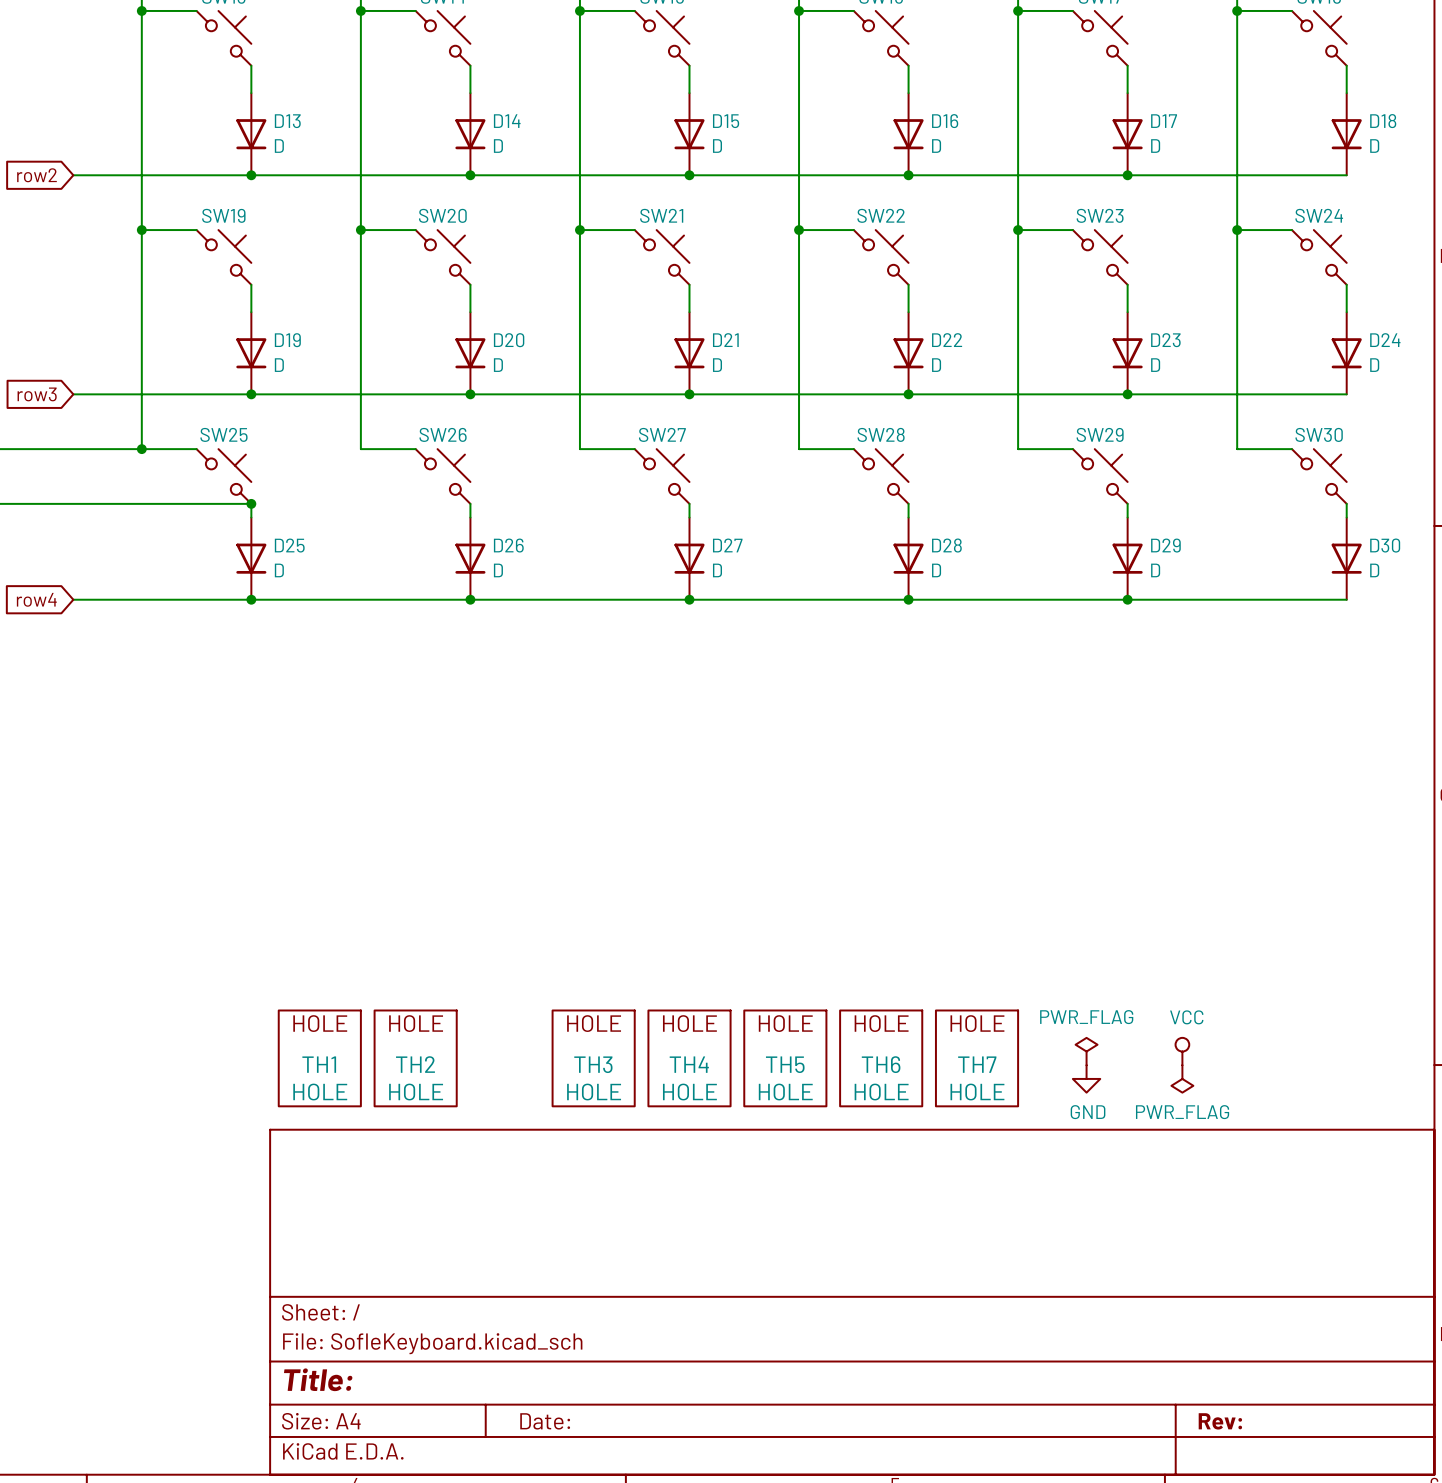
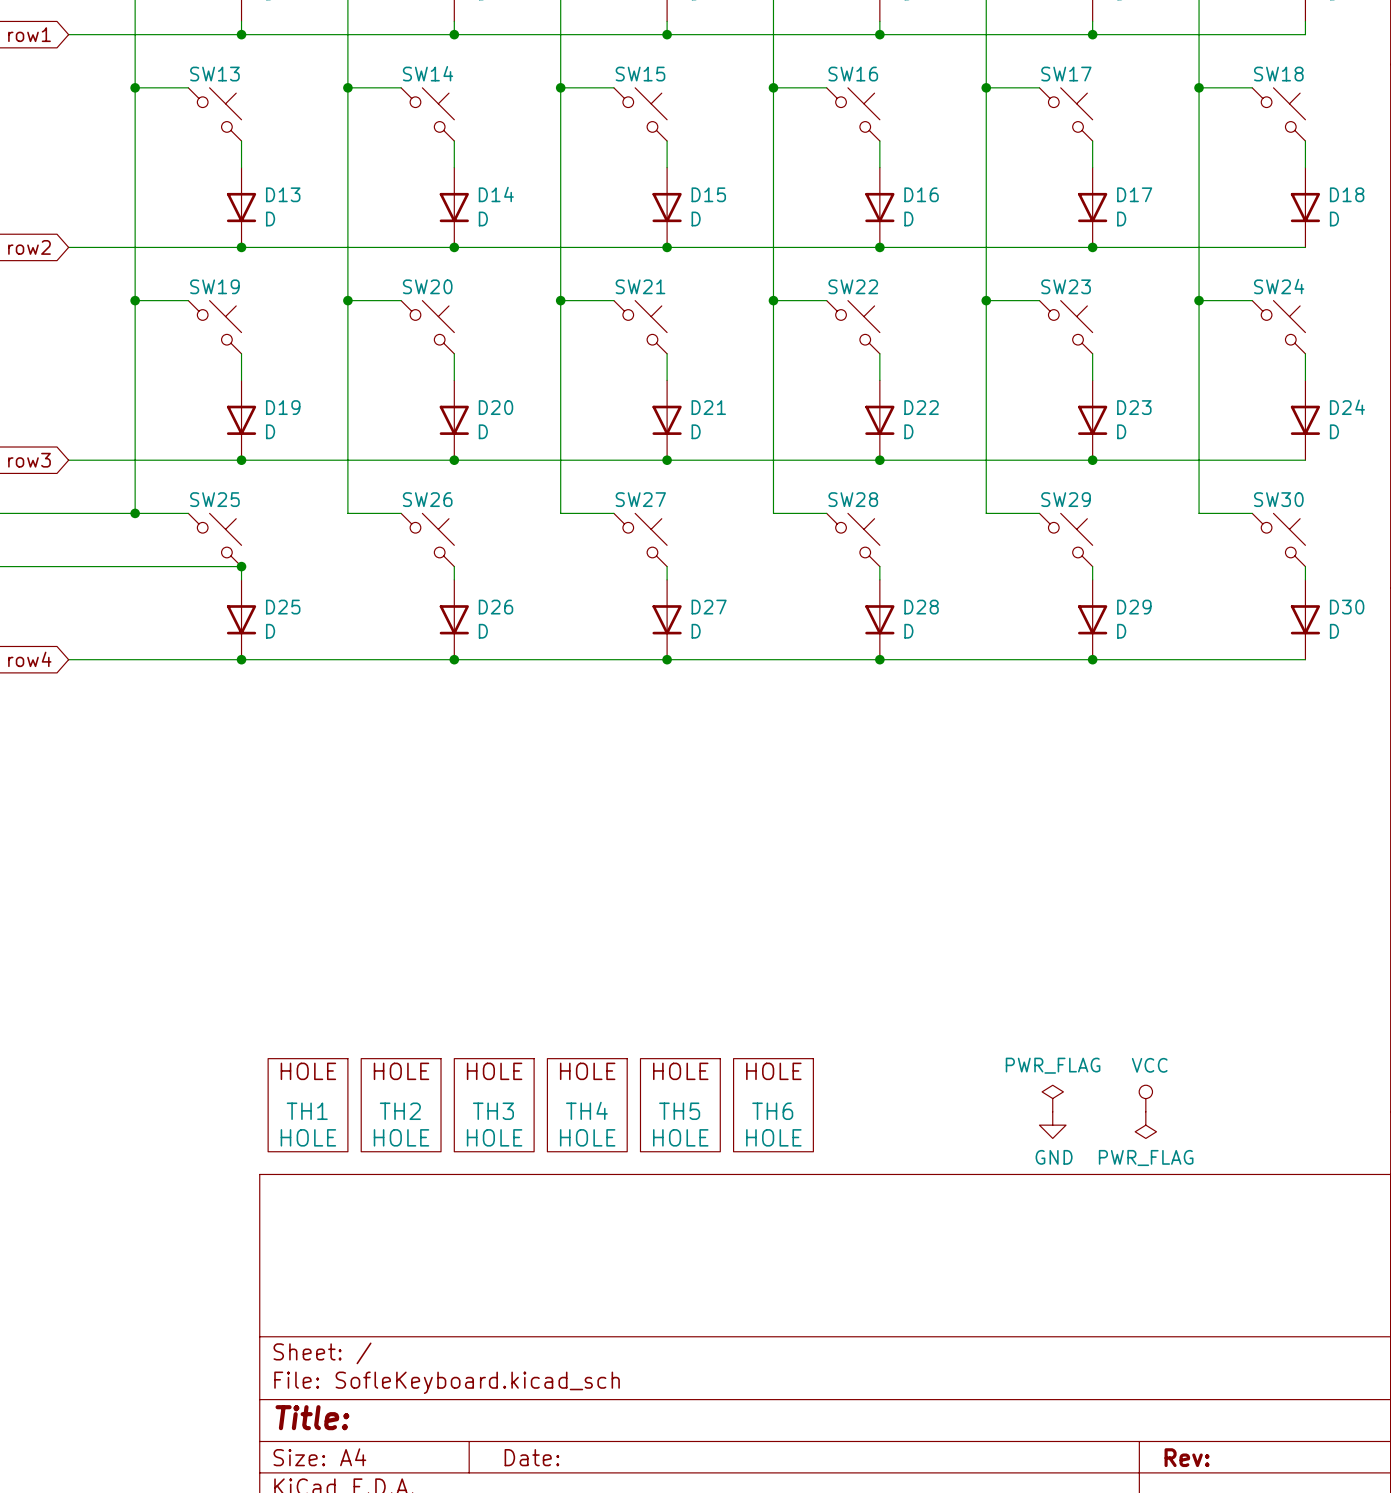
TH3 position: (593, 1058) -> (494, 1105)
TH4 position: (689, 1058) -> (587, 1105)
TH5 position: (785, 1058) -> (680, 1105)
TH6 position: (881, 1058) -> (773, 1105)
TH7: HOLE (977, 1058) -> none

